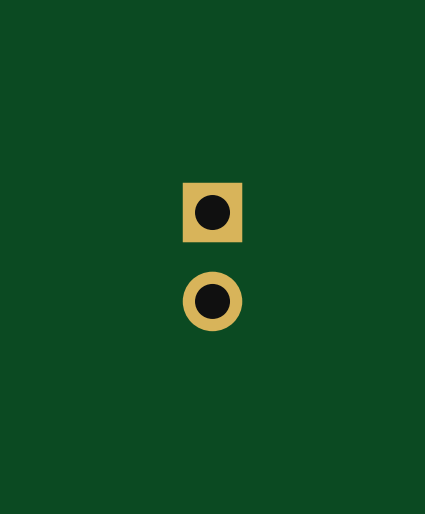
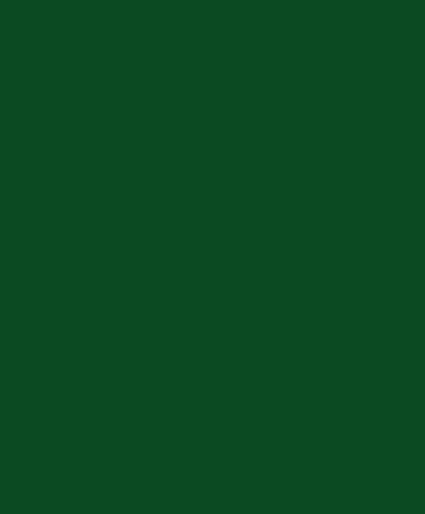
part: (212, 256) -> none

